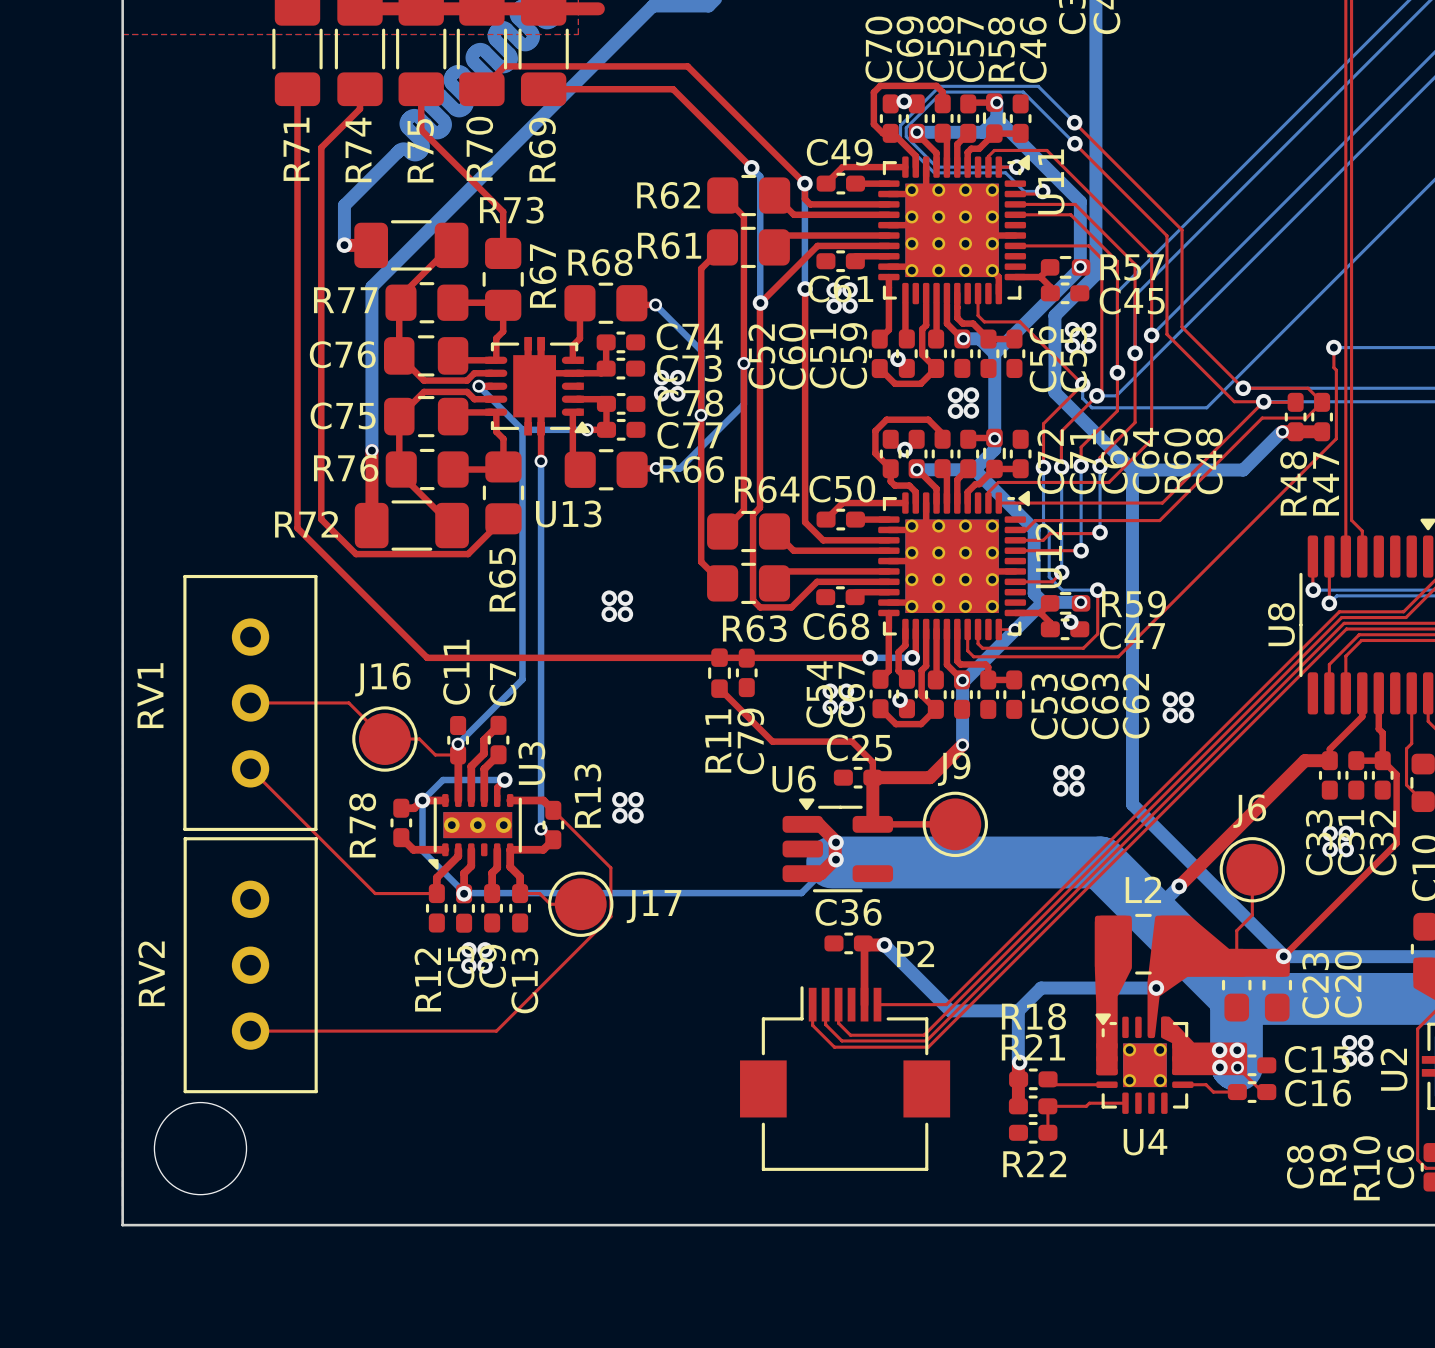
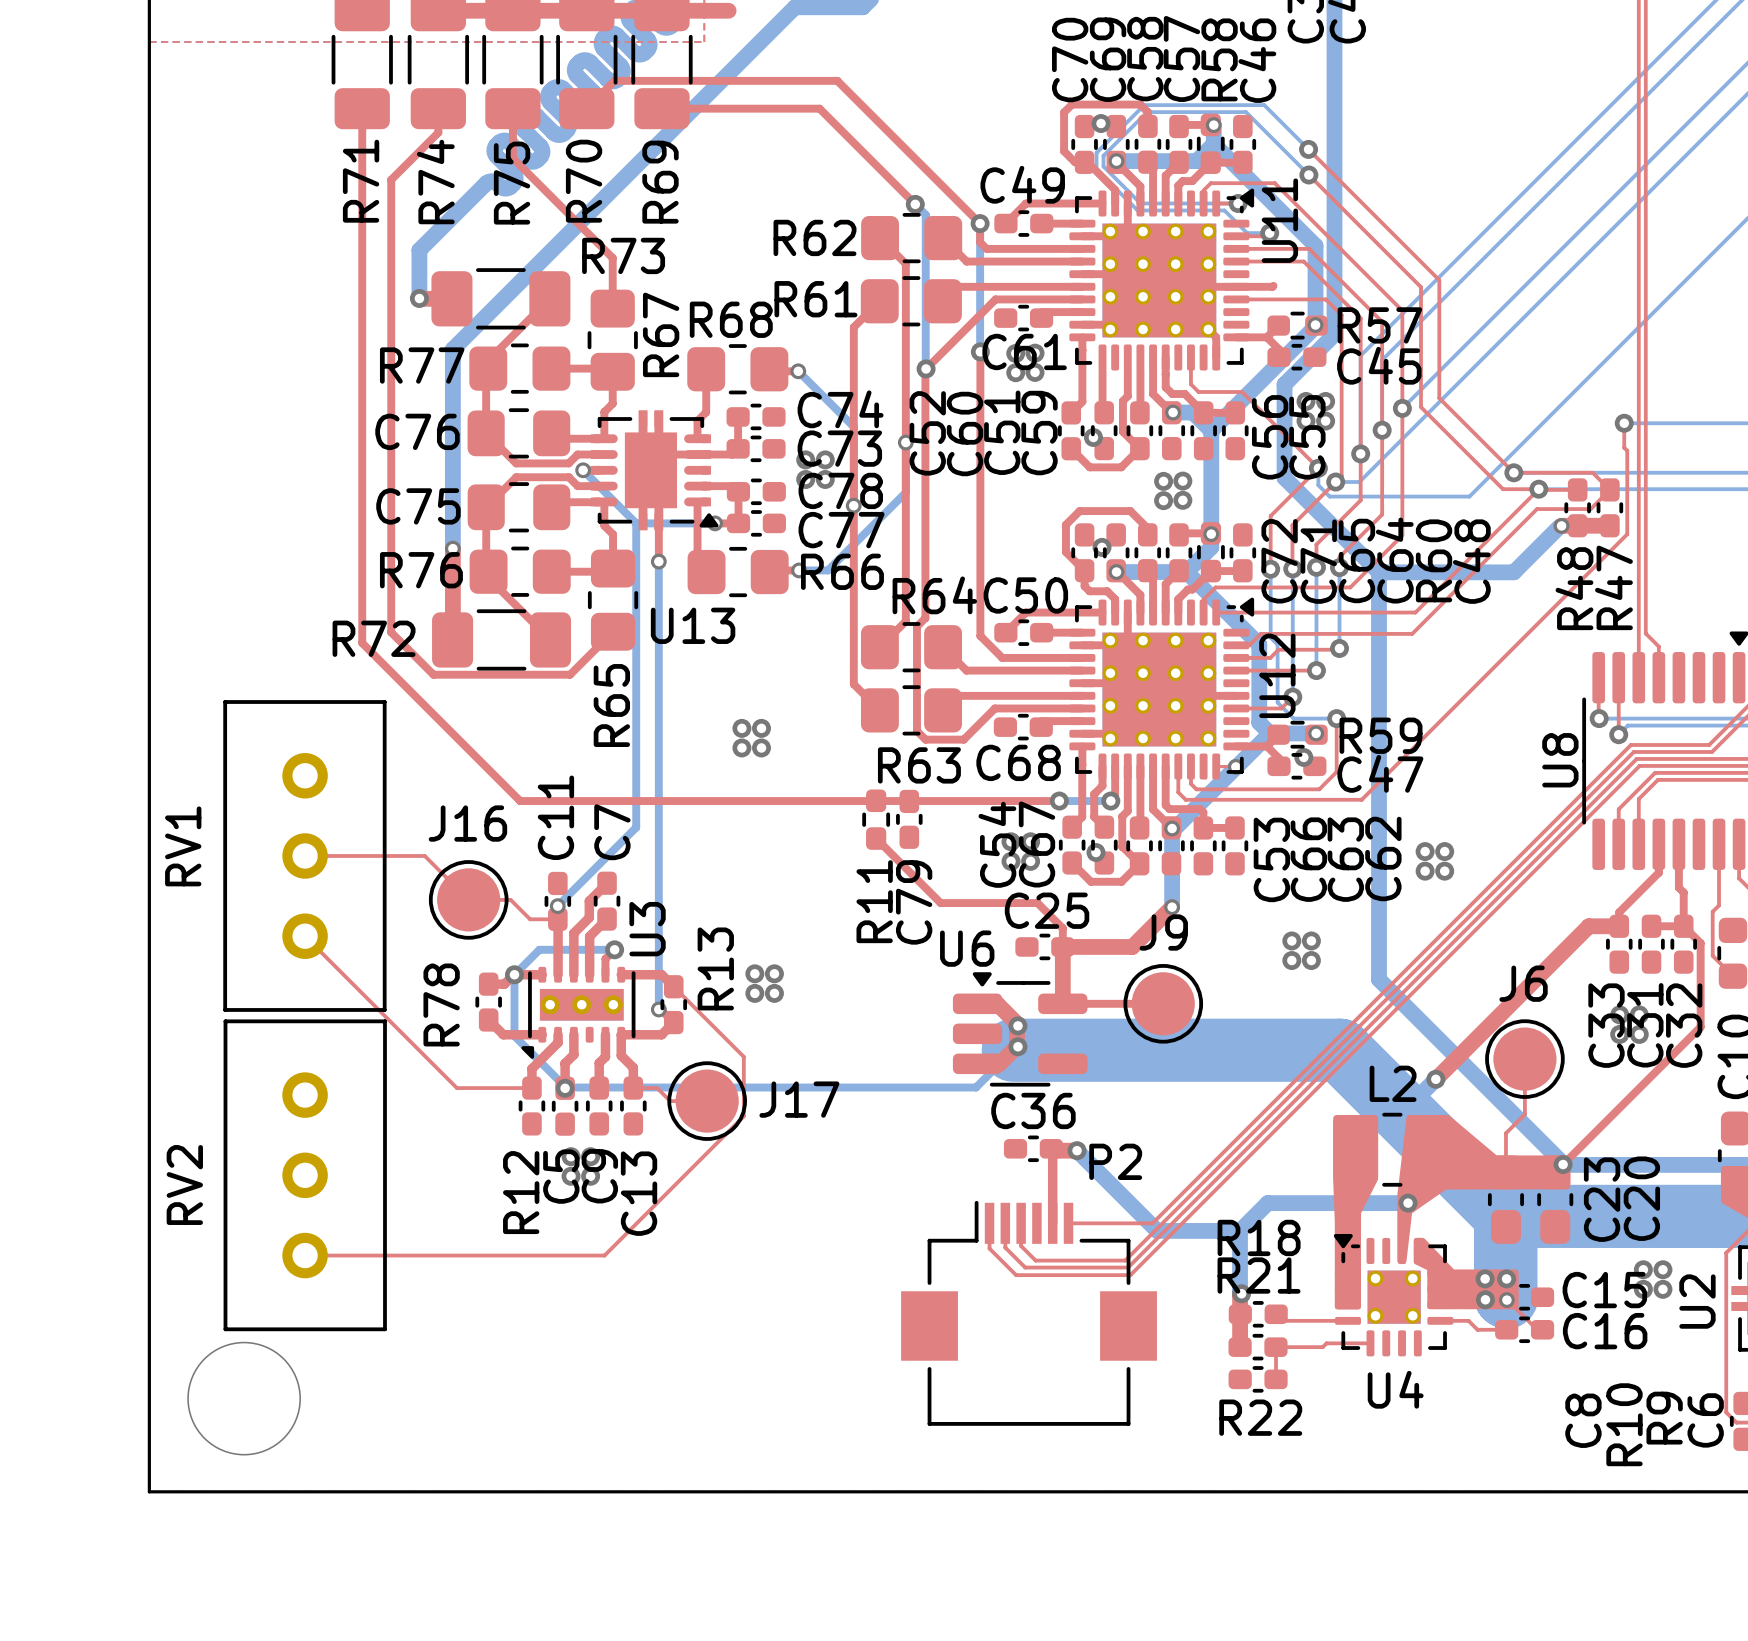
top track: none -> (1273, 285) (1236, 286)
R9 name position: R9 (1333, 1164) -> R9 (1664, 1418)
R10 name position: R10 (1366, 1168) -> R10 (1624, 1424)

